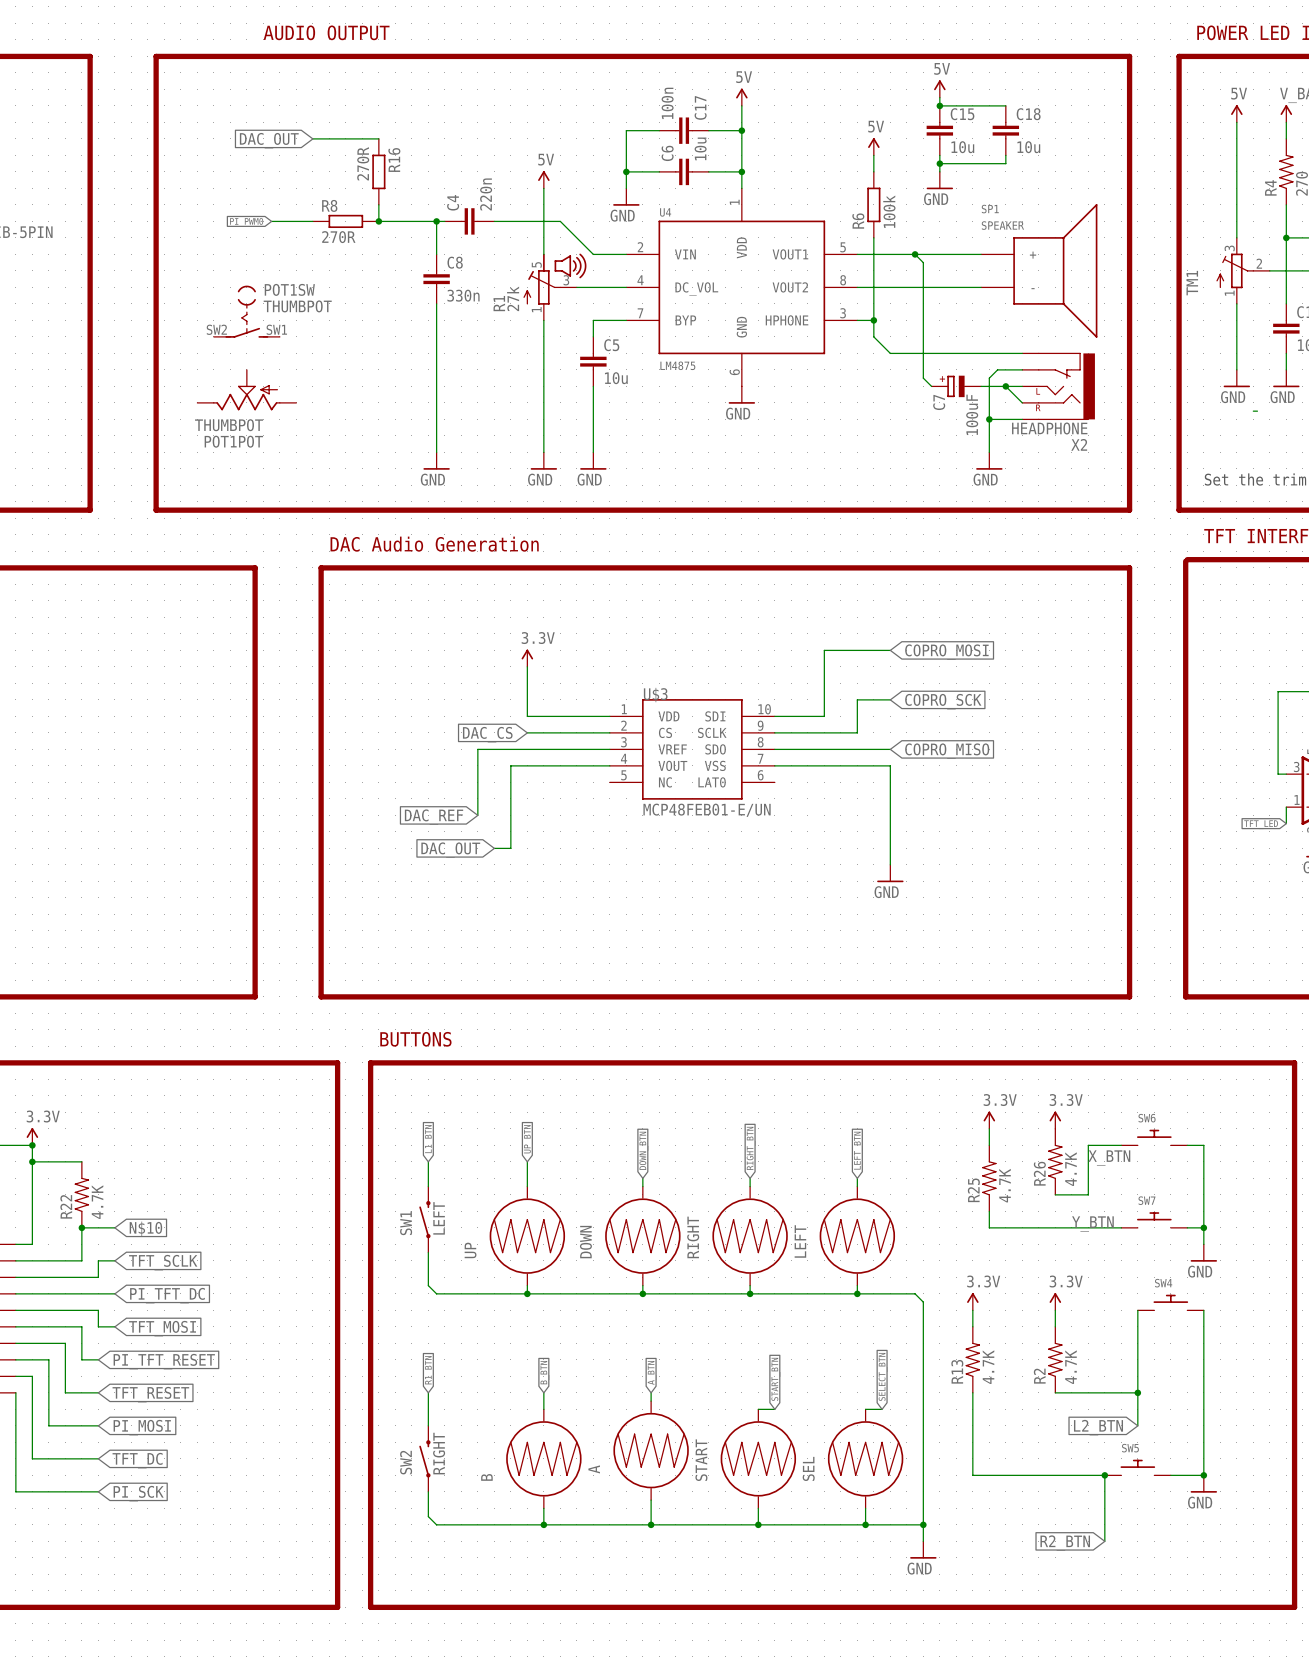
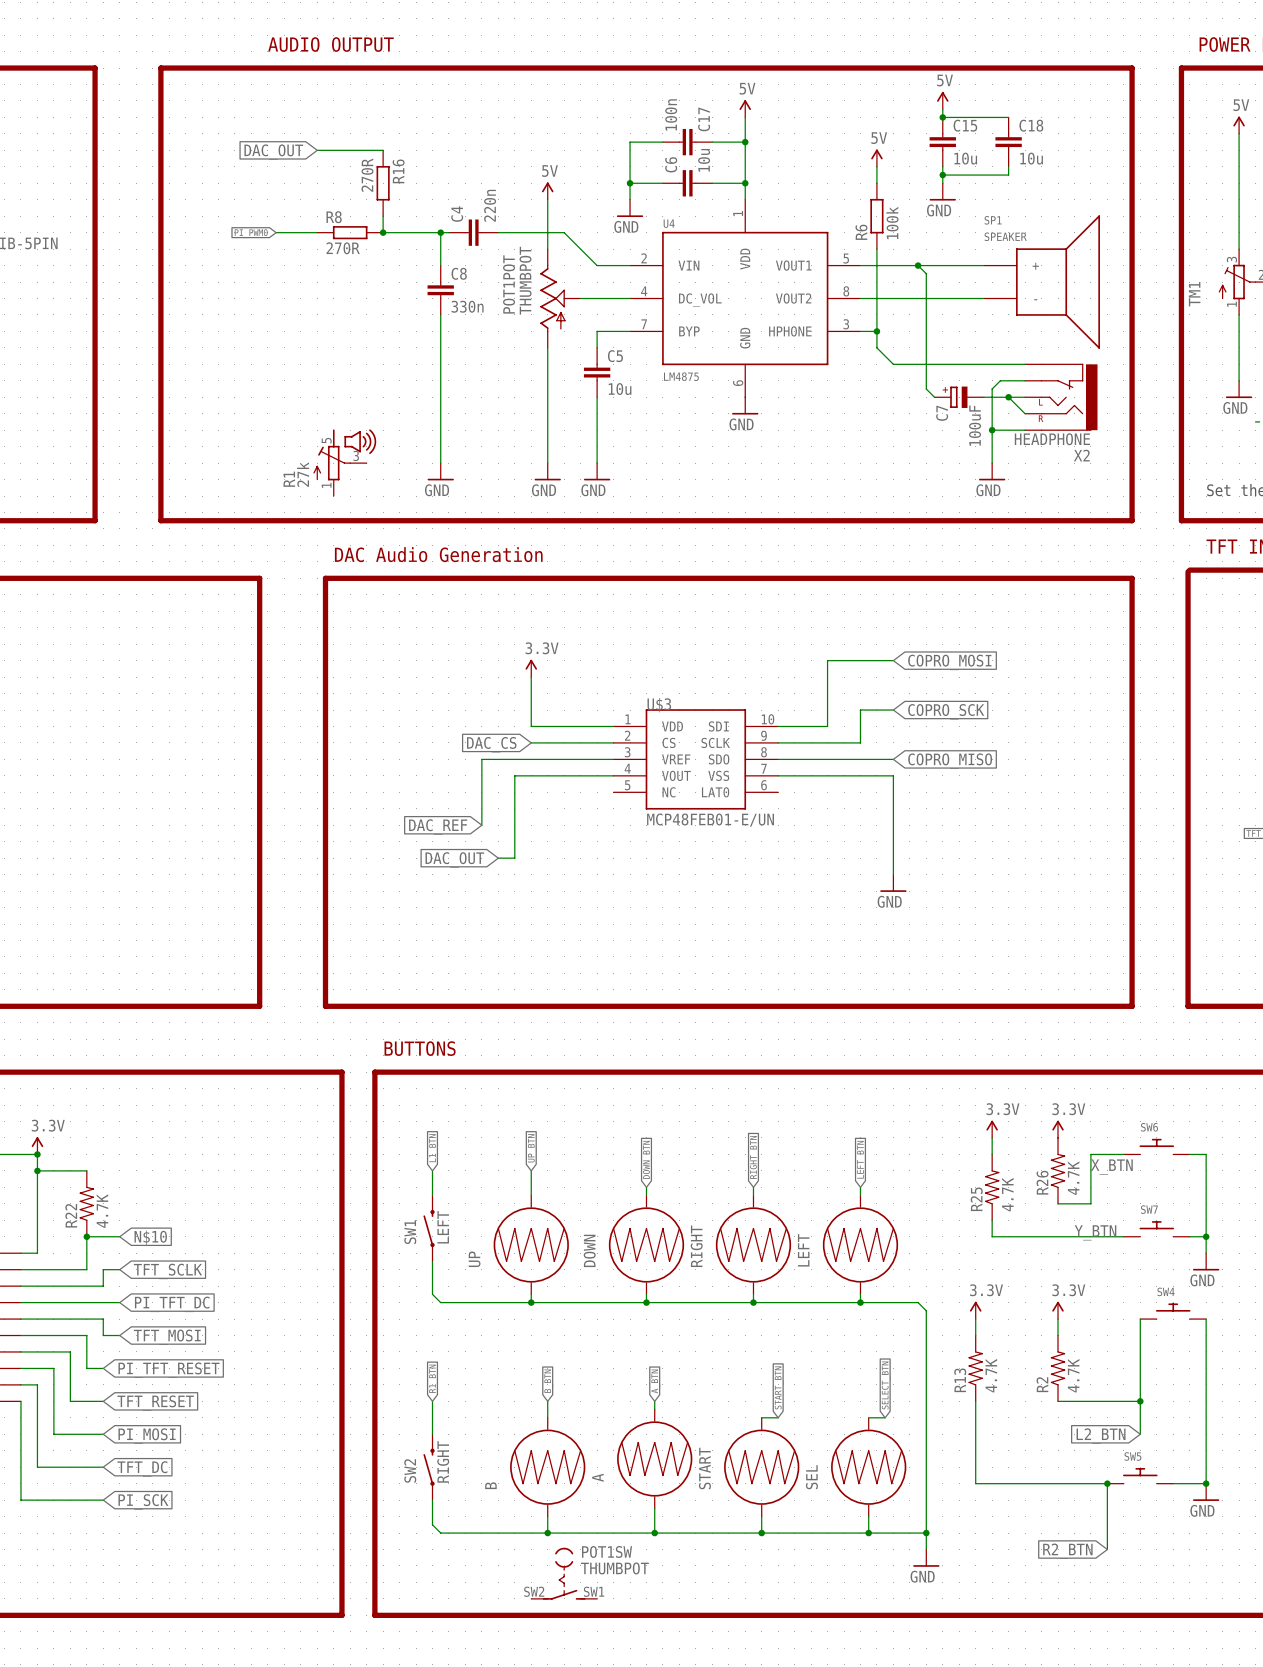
R1 position: (555, 287) -> (344, 462)
POT1SW position: (246, 311) -> (564, 1573)
POT1POT position: (246, 390) -> (560, 298)
POT1POT rotation: 0° (246, 397) -> 90° clockwise (552, 298)

